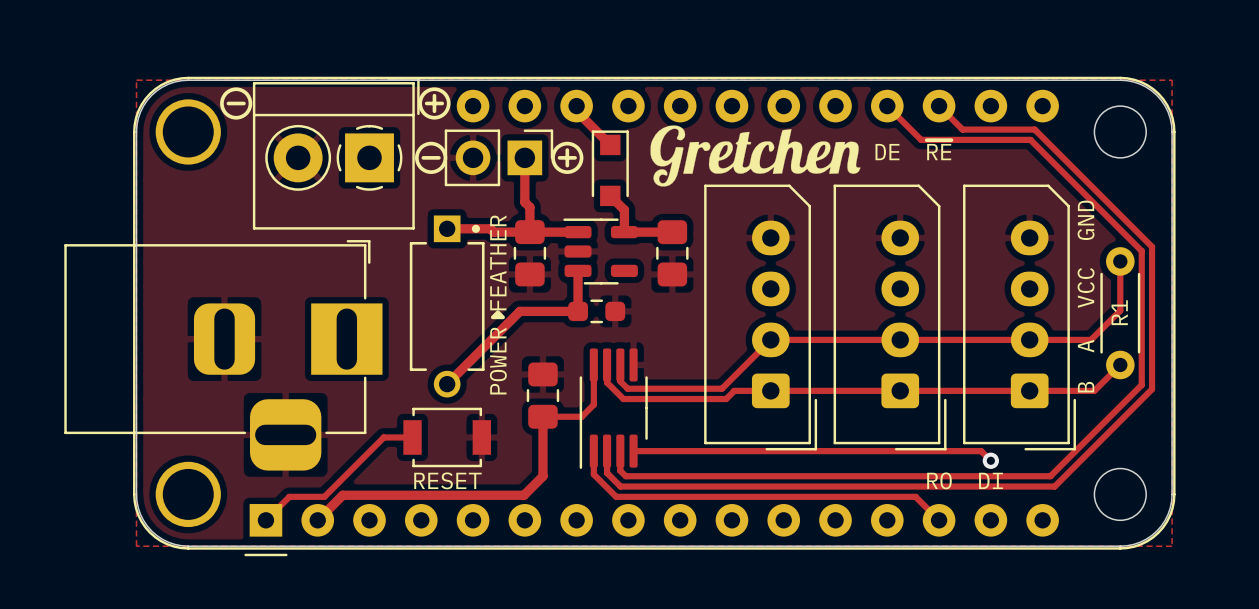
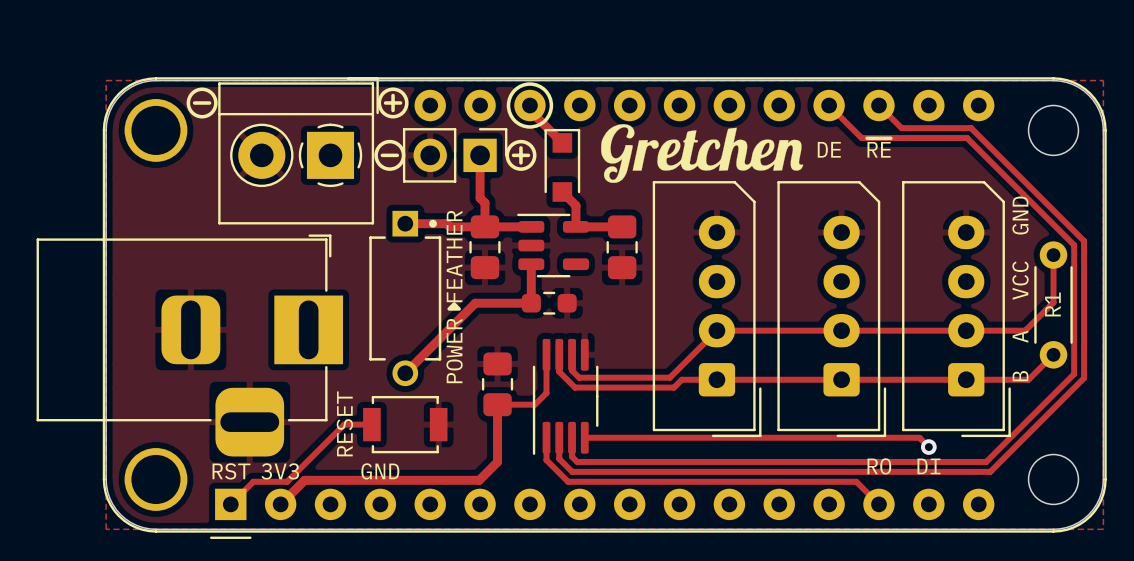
drawing: none -> [506, 82, 554, 129]
text rotation: 0° (447, 480) -> 90° counterclockwise (344, 423)
text: none -> RST (231, 471)
text: none -> 3V3 (280, 471)
text: none -> GND (380, 471)

